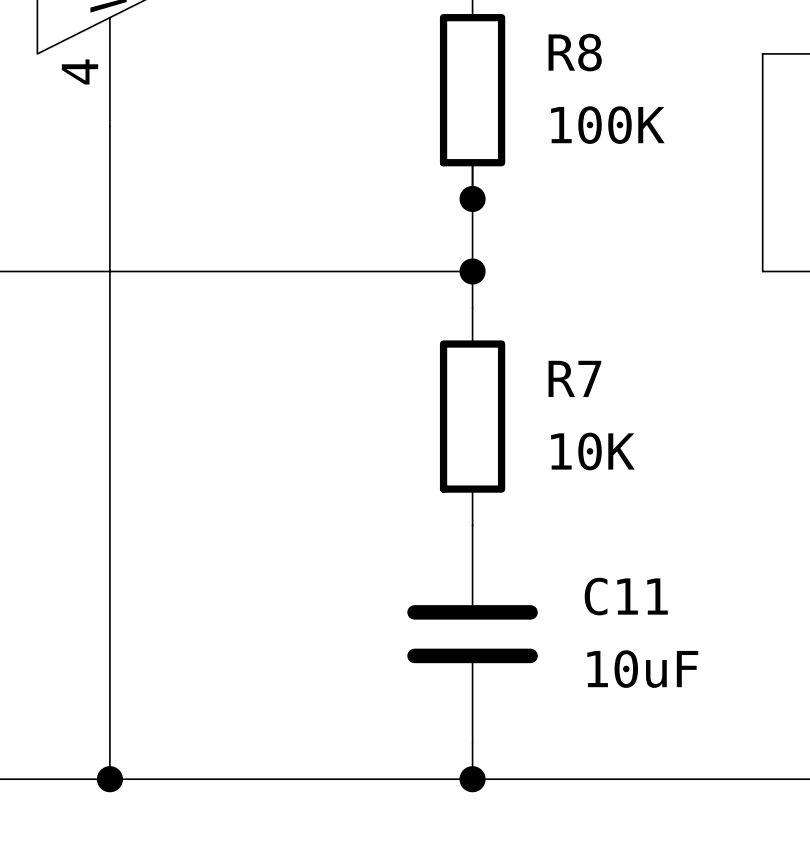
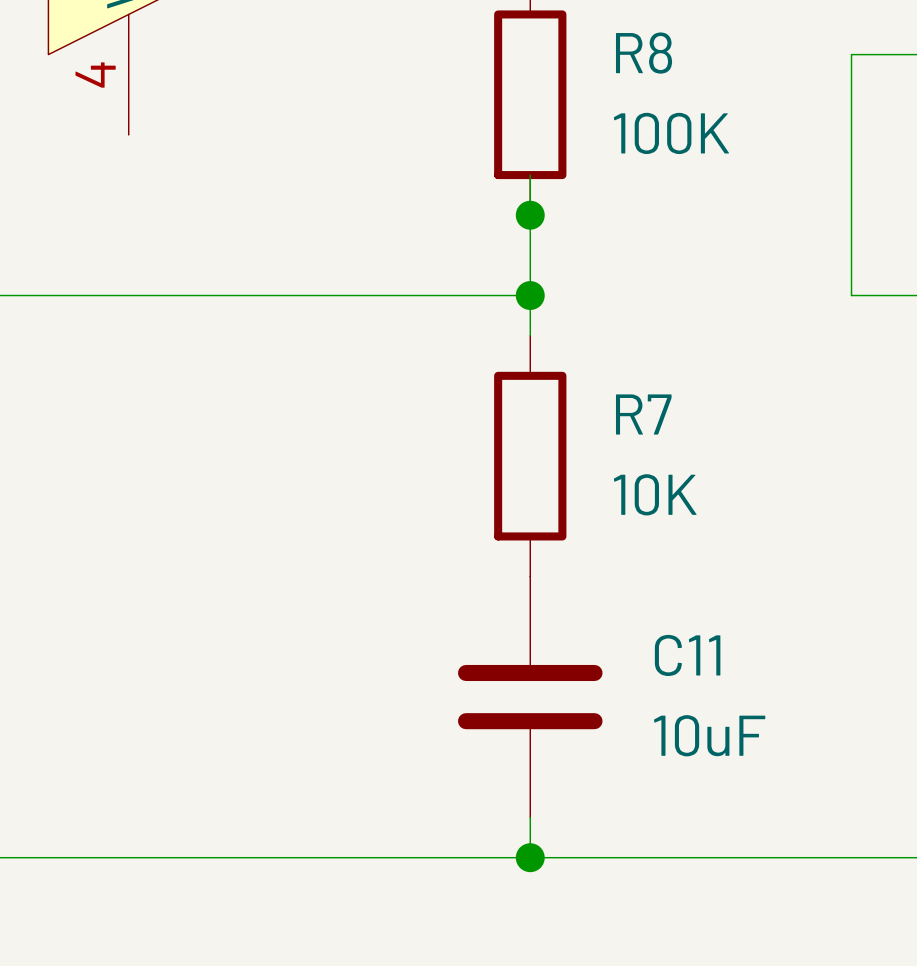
wire: (109, 126) (109, 779) -> none
junction: (109, 779) -> none

